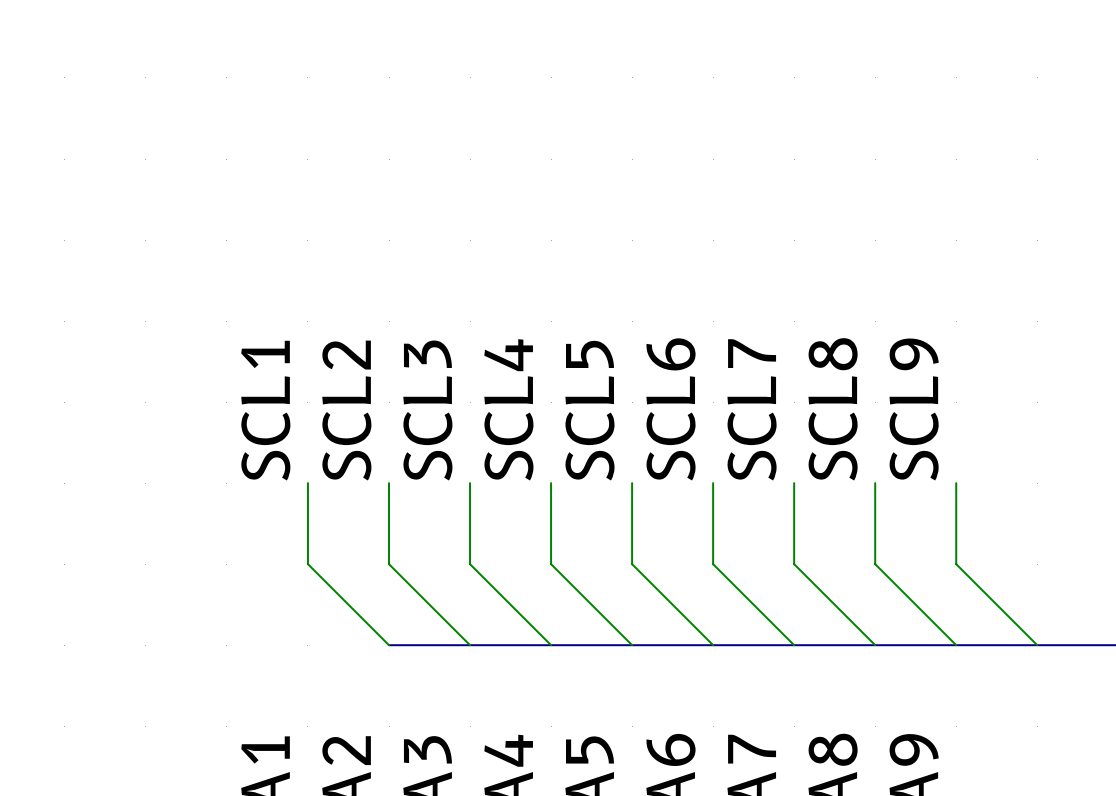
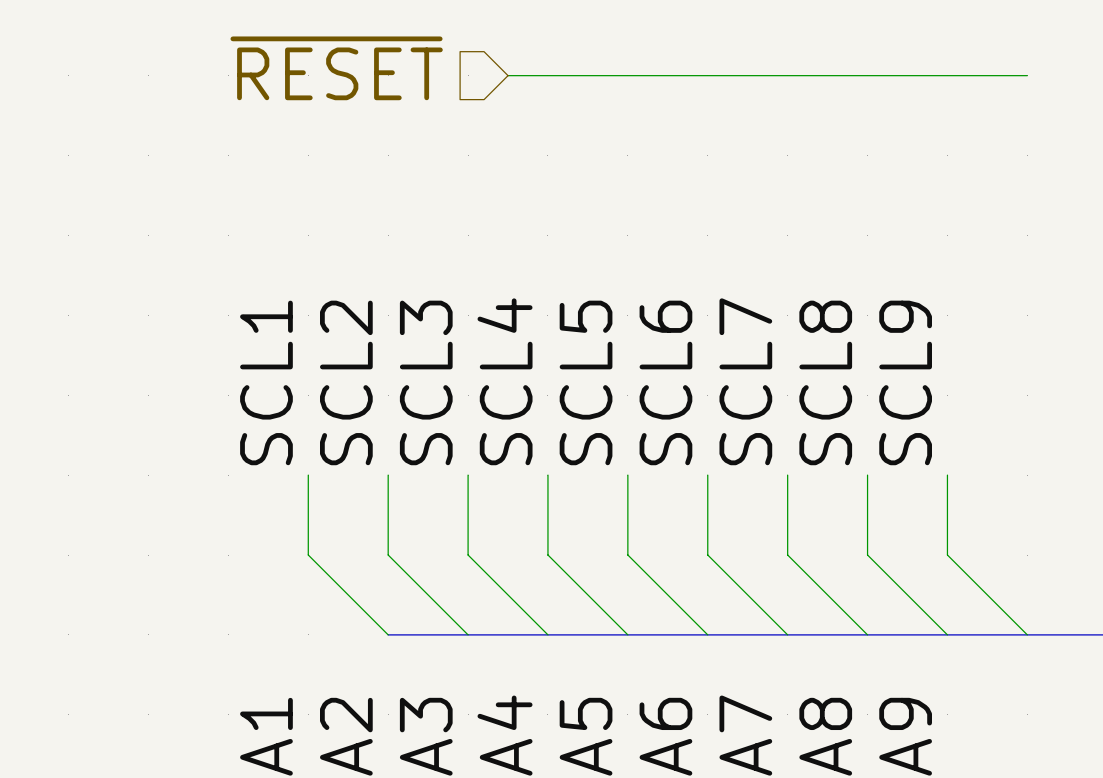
hierarchical label: none -> ~{RESET} (336, 68)
wire: none -> (508, 75) (1027, 75)

